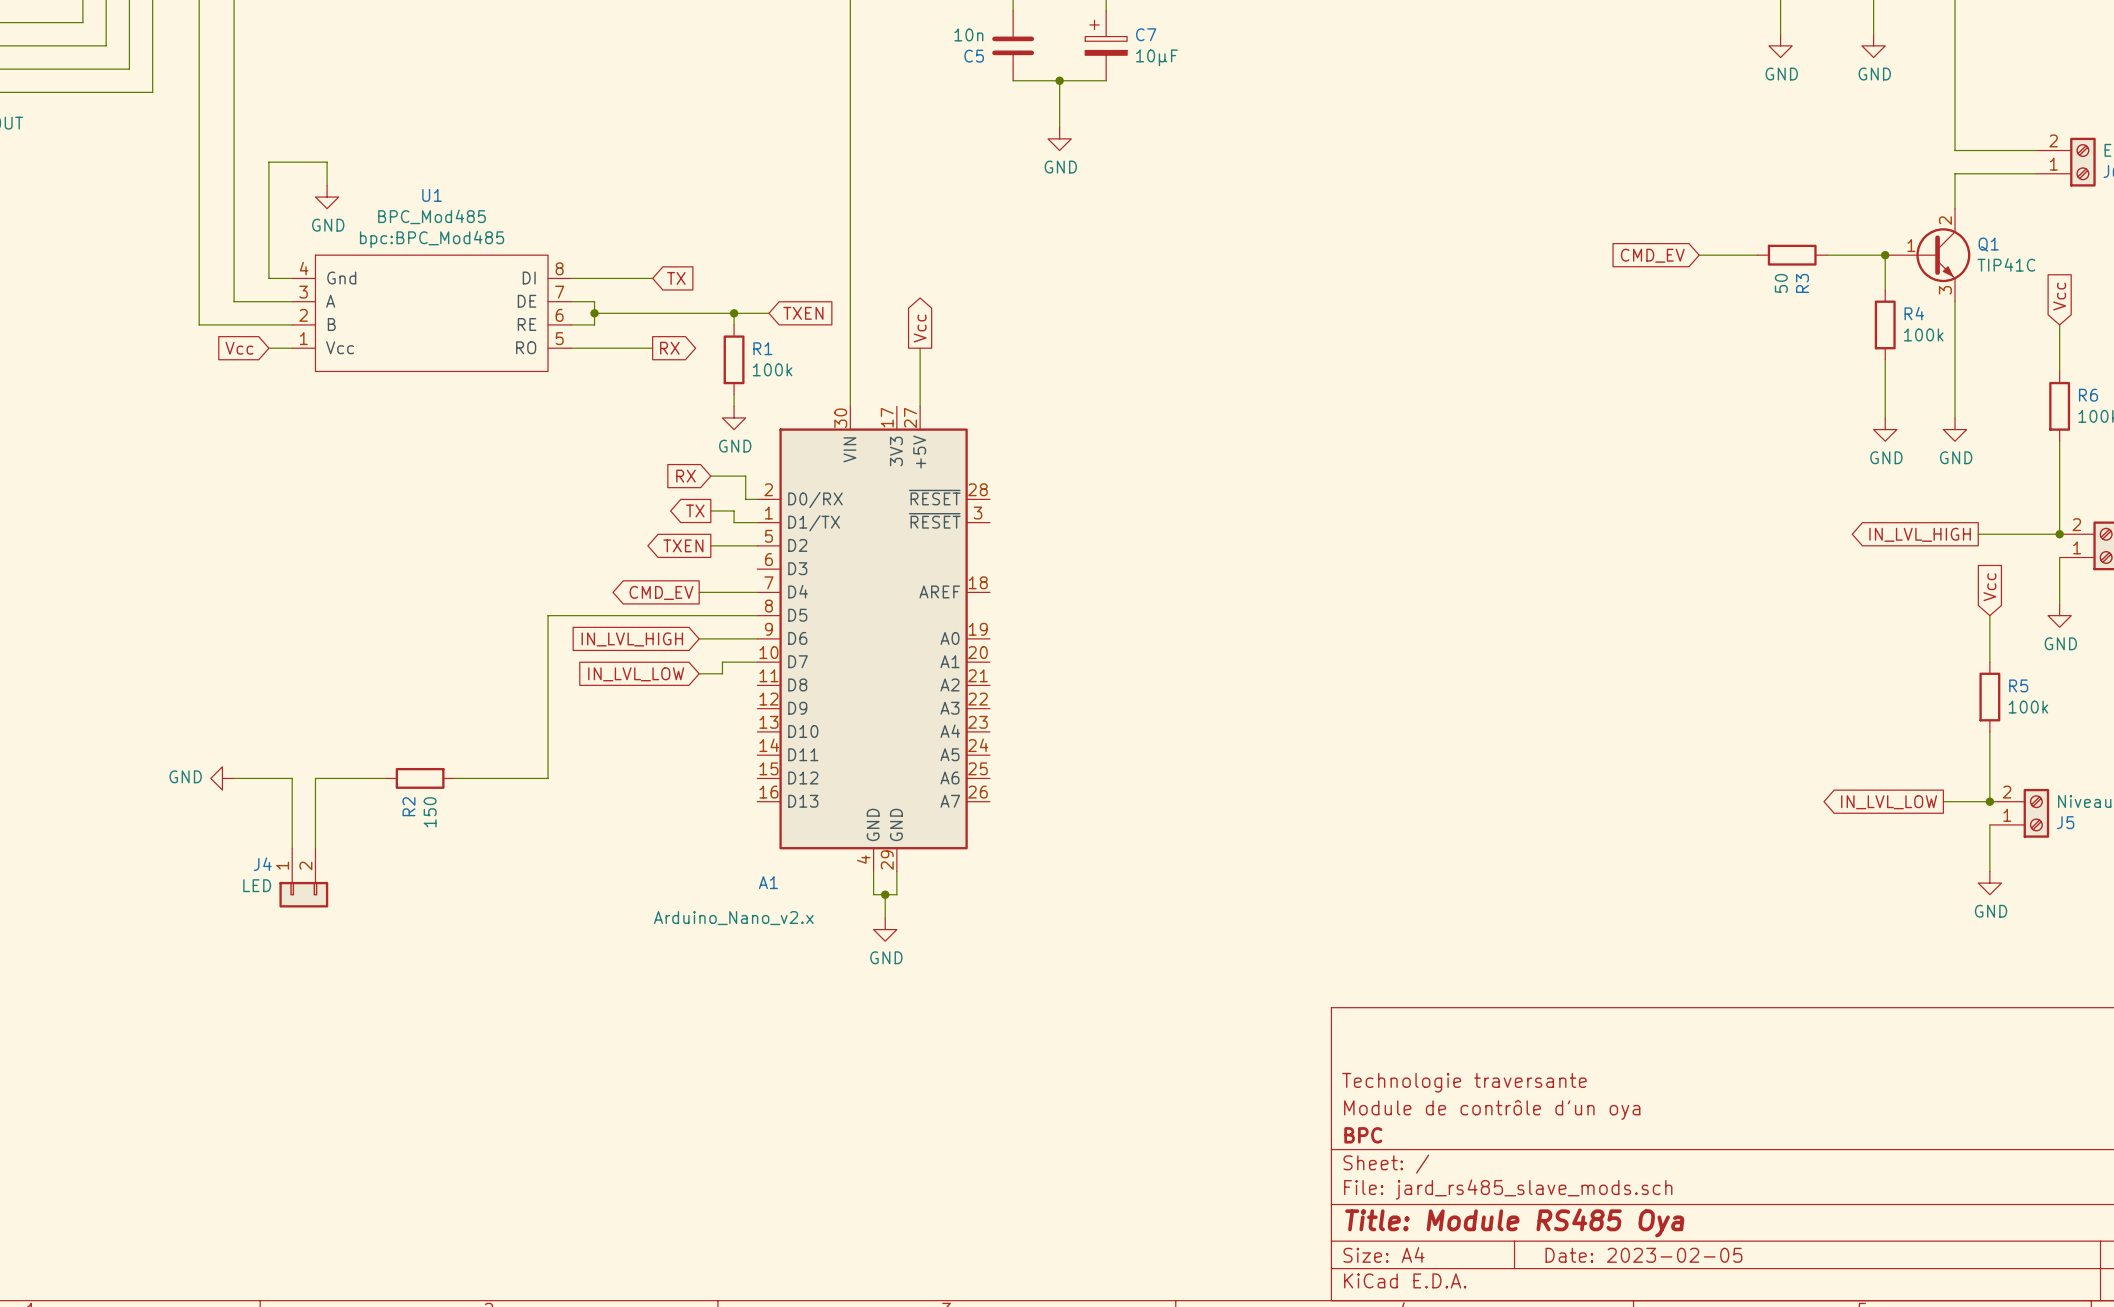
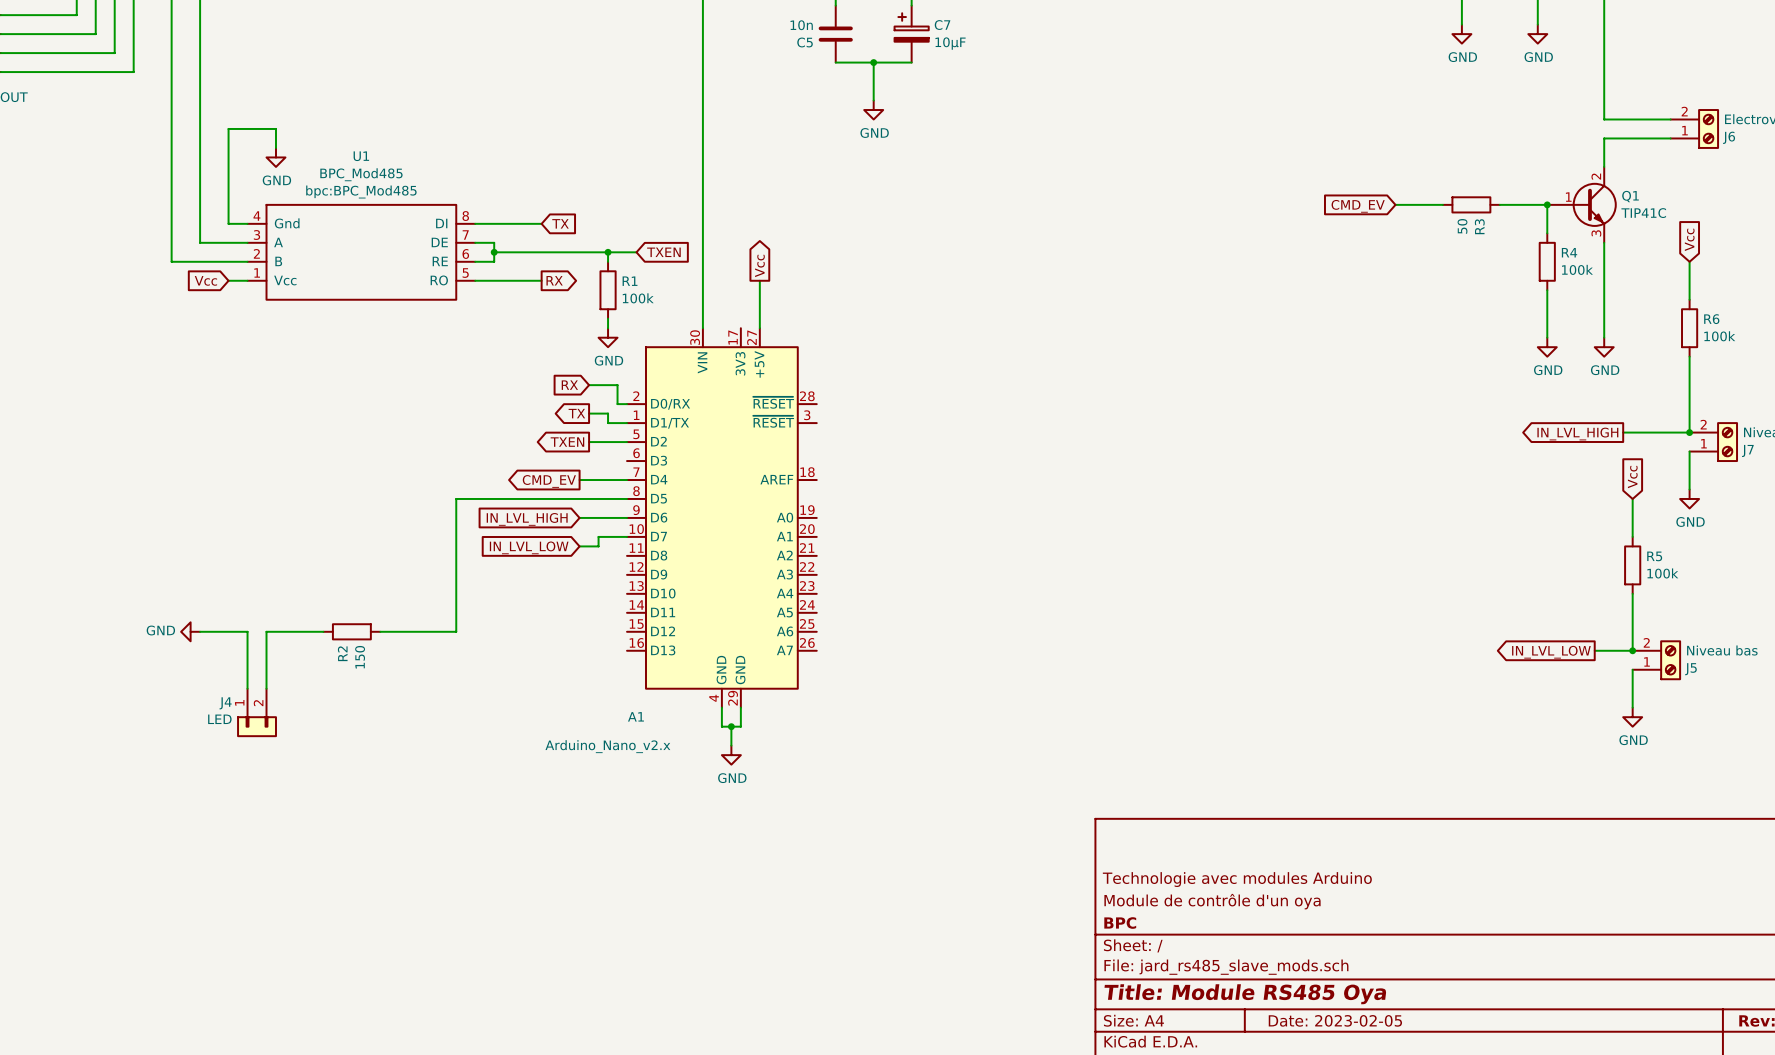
title block: Technologie traversante (1464, 1082) -> Technologie avec modules Arduino (1237, 879)

